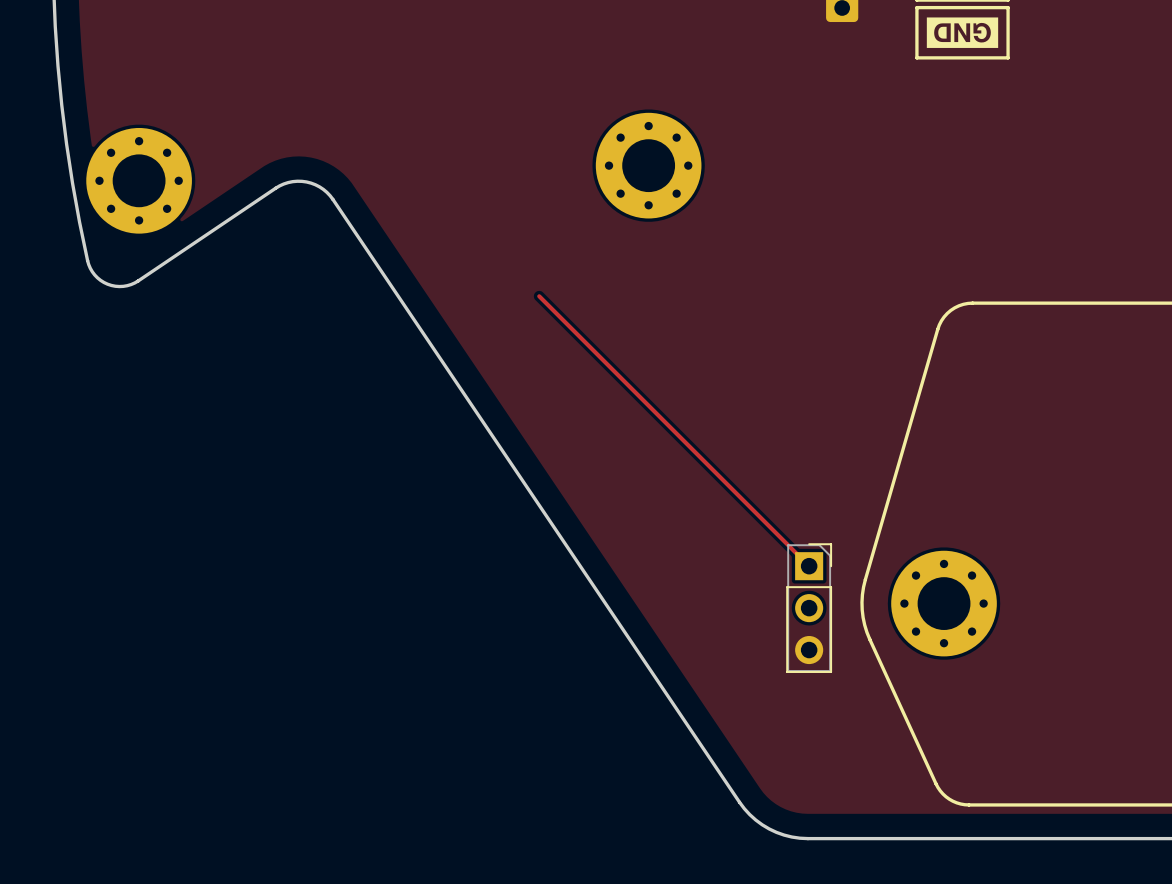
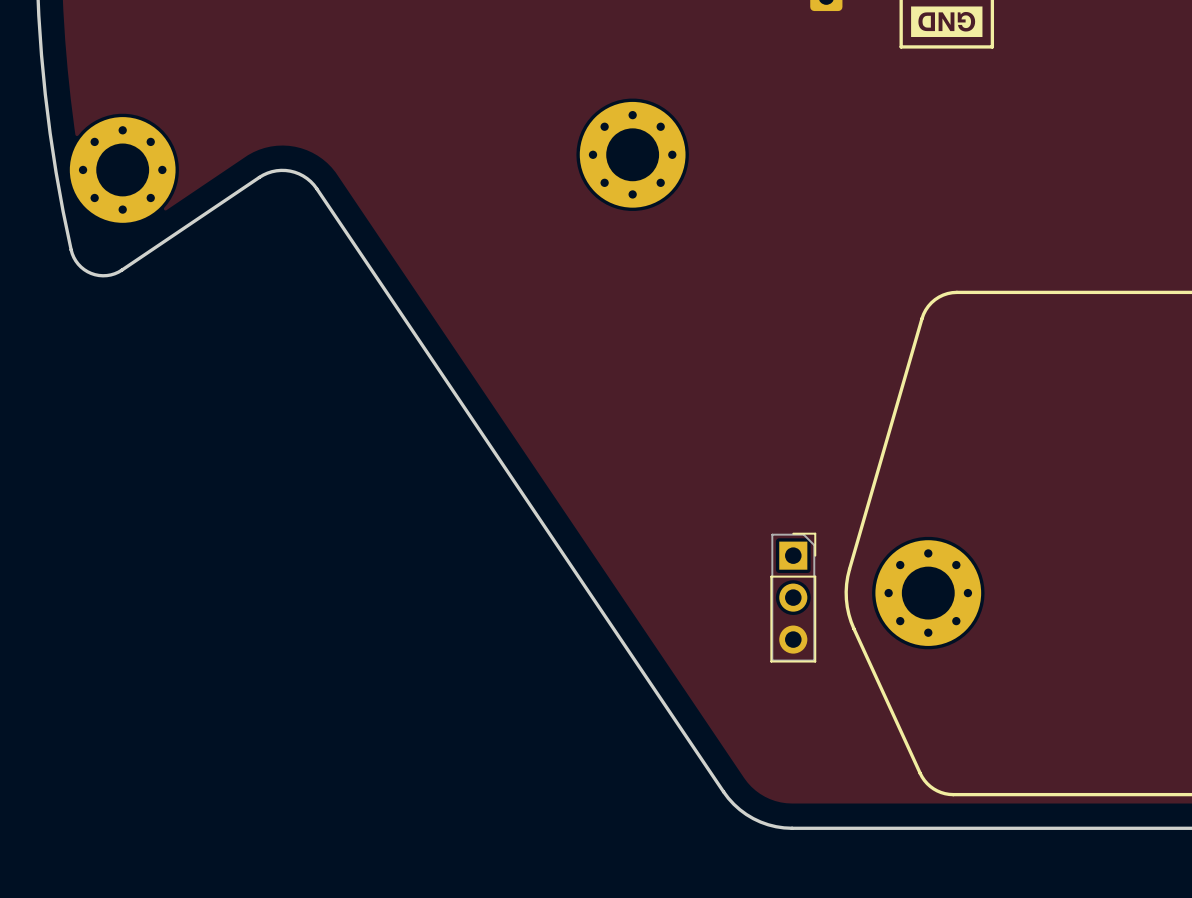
track: (539, 296) (809, 566) -> none

